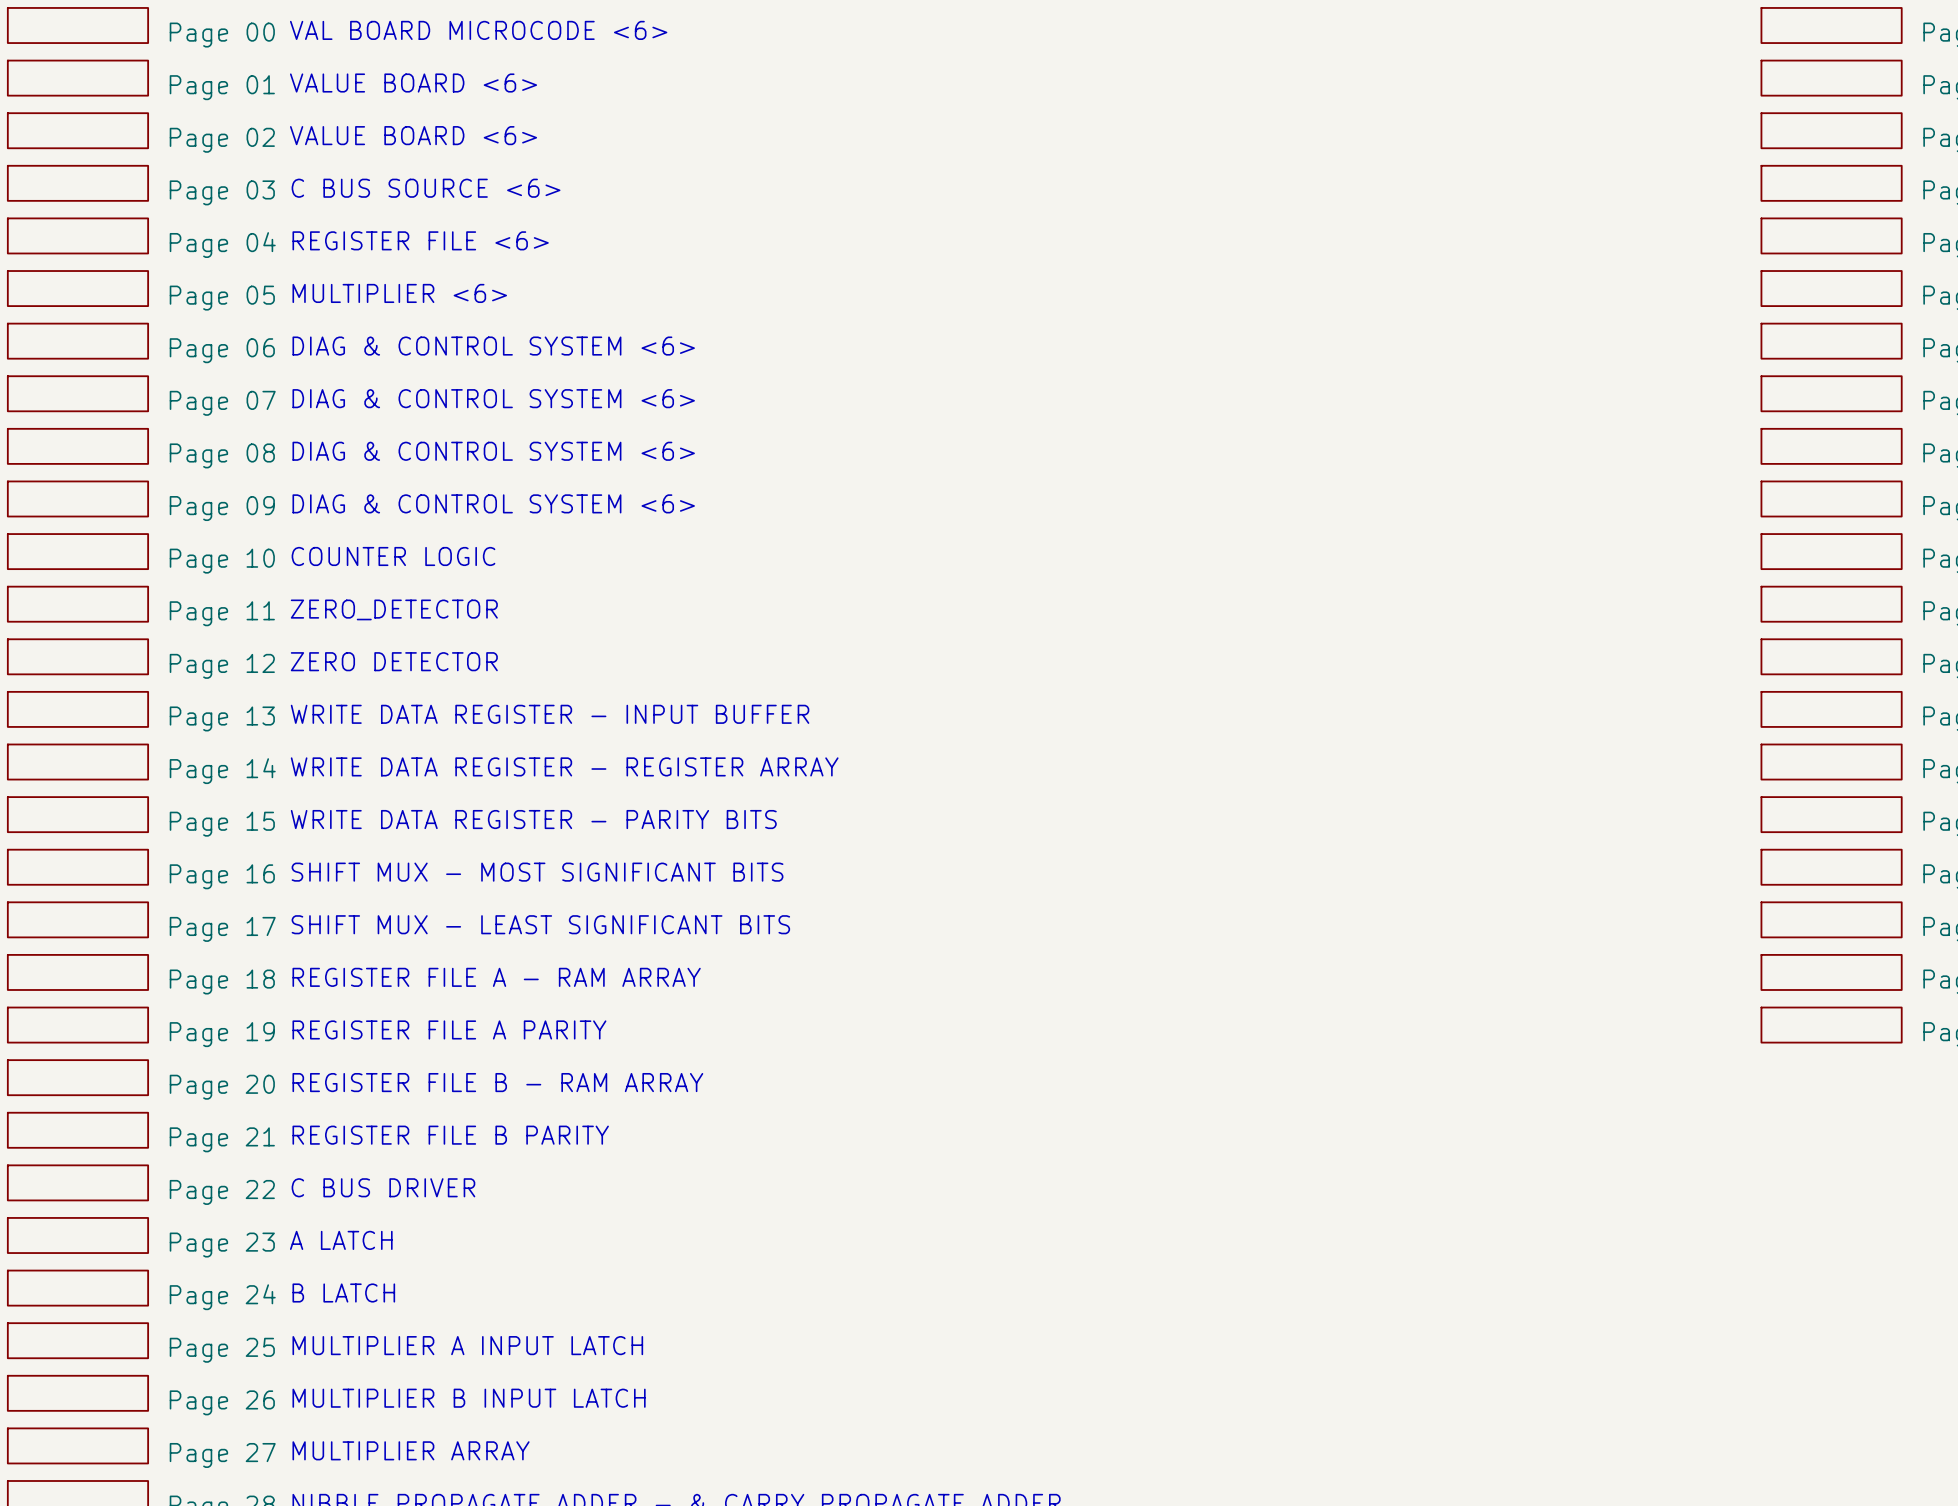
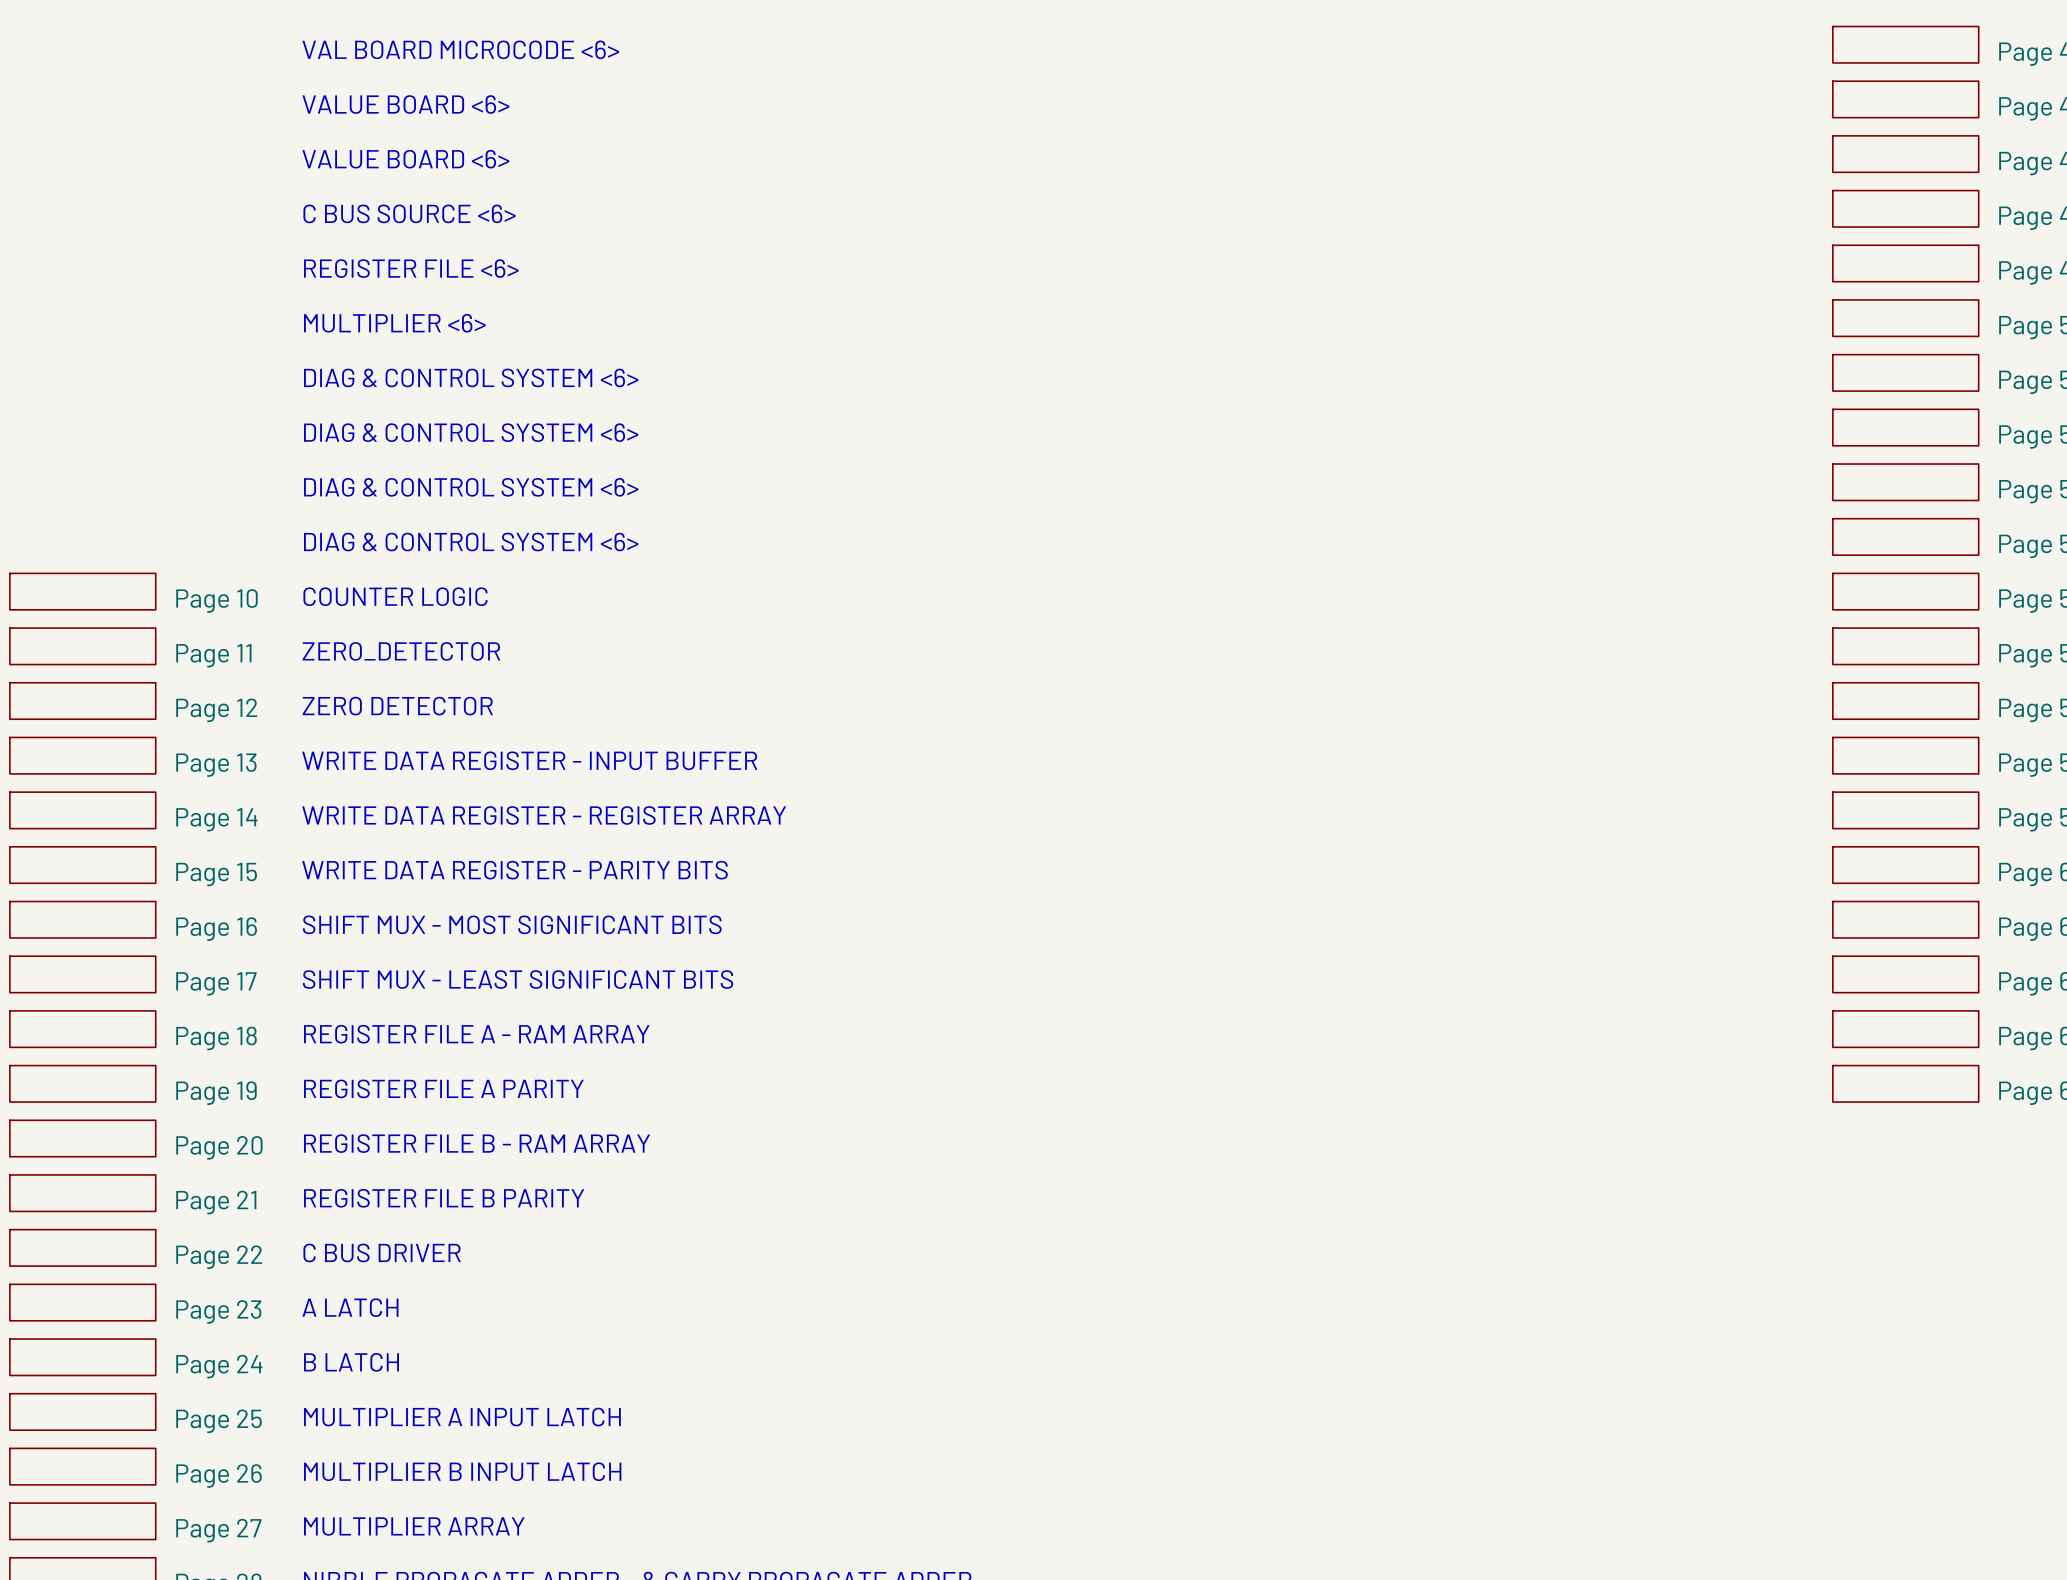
sheet Page 00: (77, 25) -> none
sheet Page 01: (77, 78) -> none
sheet Page 02: (77, 130) -> none
sheet Page 03: (77, 183) -> none
sheet Page 04: (77, 235) -> none
sheet Page 05: (77, 288) -> none
sheet Page 06: (77, 341) -> none
sheet Page 07: (77, 393) -> none
sheet Page 08: (77, 446) -> none
sheet Page 09: (77, 498) -> none

